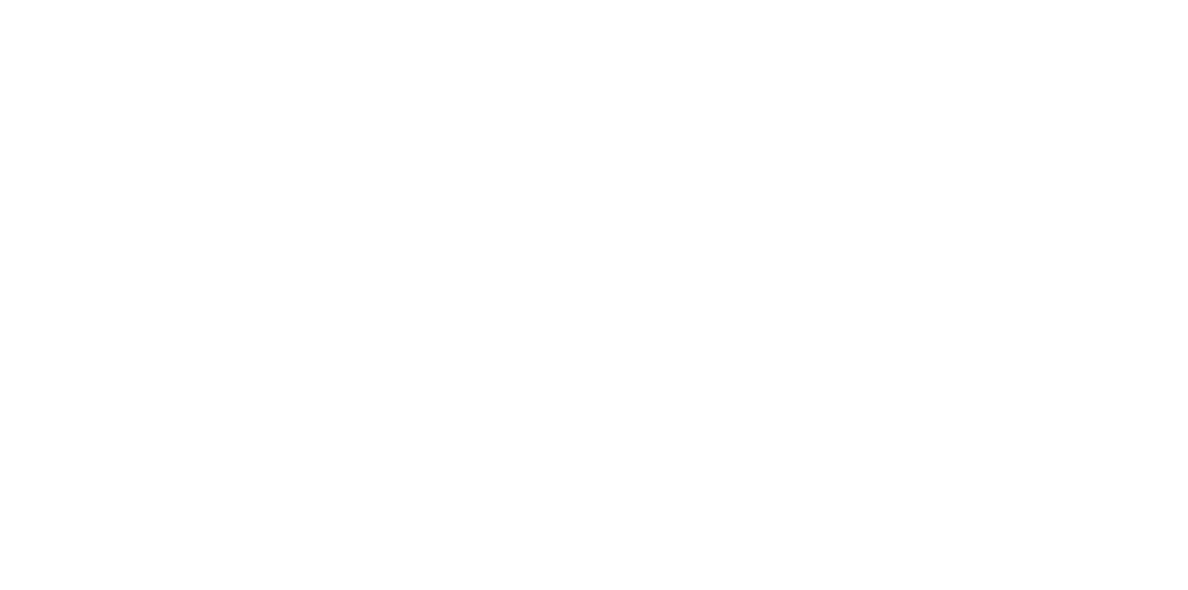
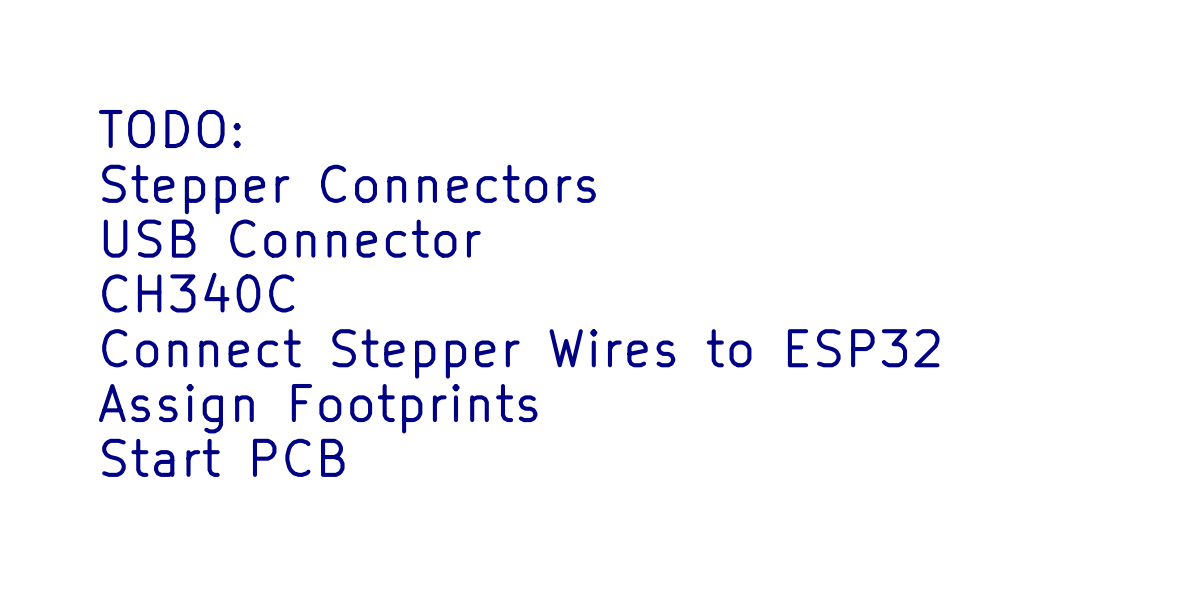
text: none -> TODO: (169, 129)
text: none -> Stepper Connectors (348, 189)
text: none -> USB Connector (292, 238)
text: none -> CH340C (198, 292)
text: none -> Connect Stepper Wires to ESP32 (520, 353)
text: none -> Assign Footprints (318, 408)
text: none -> Start PCB (223, 457)

